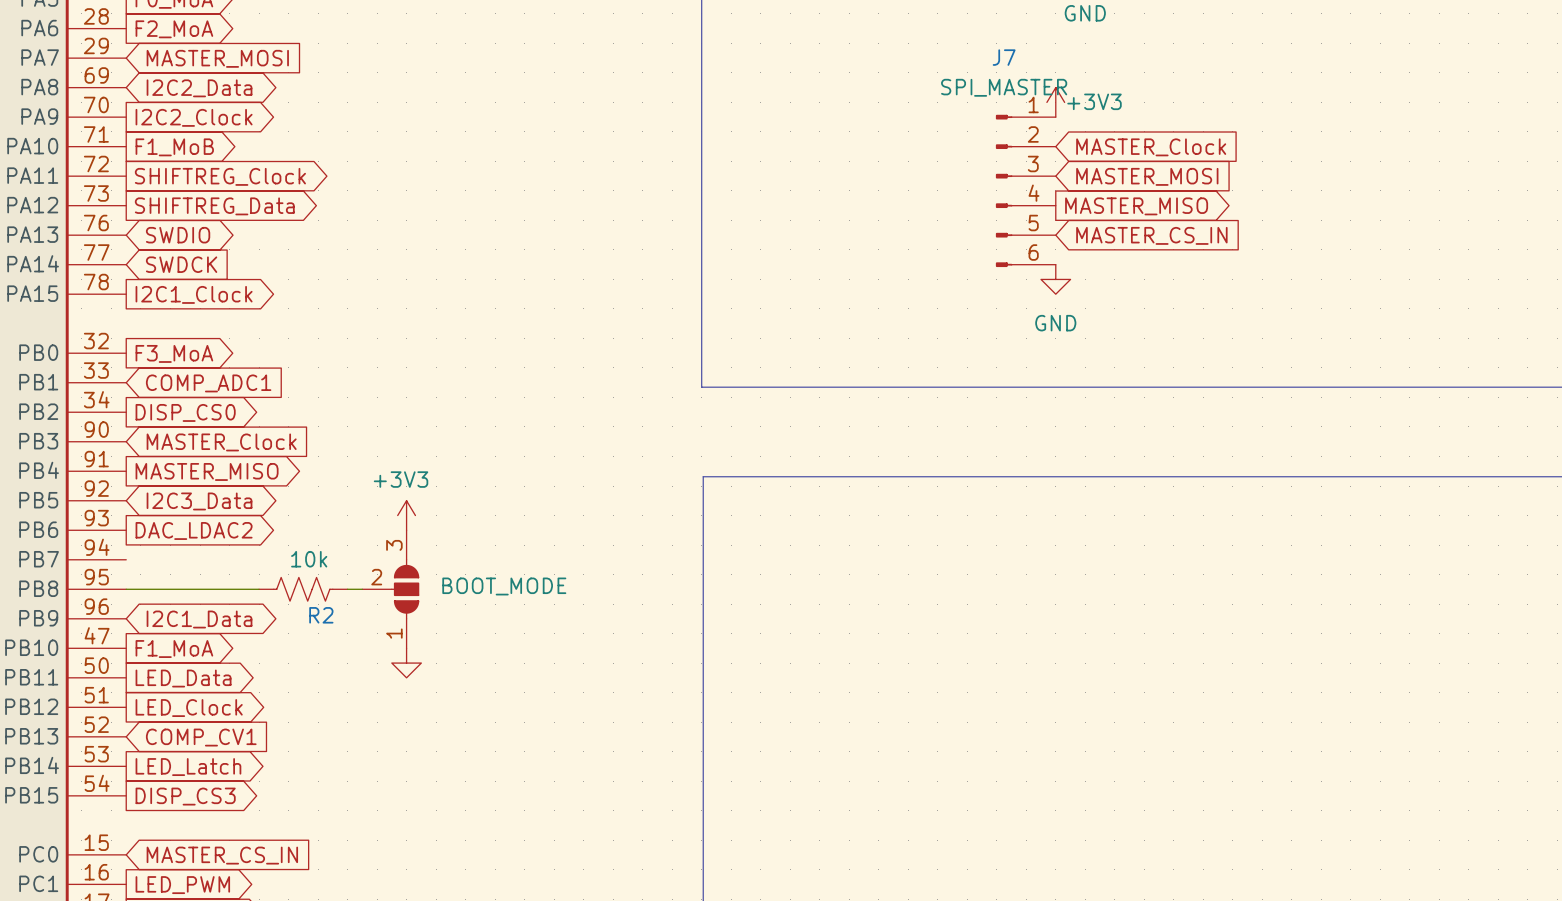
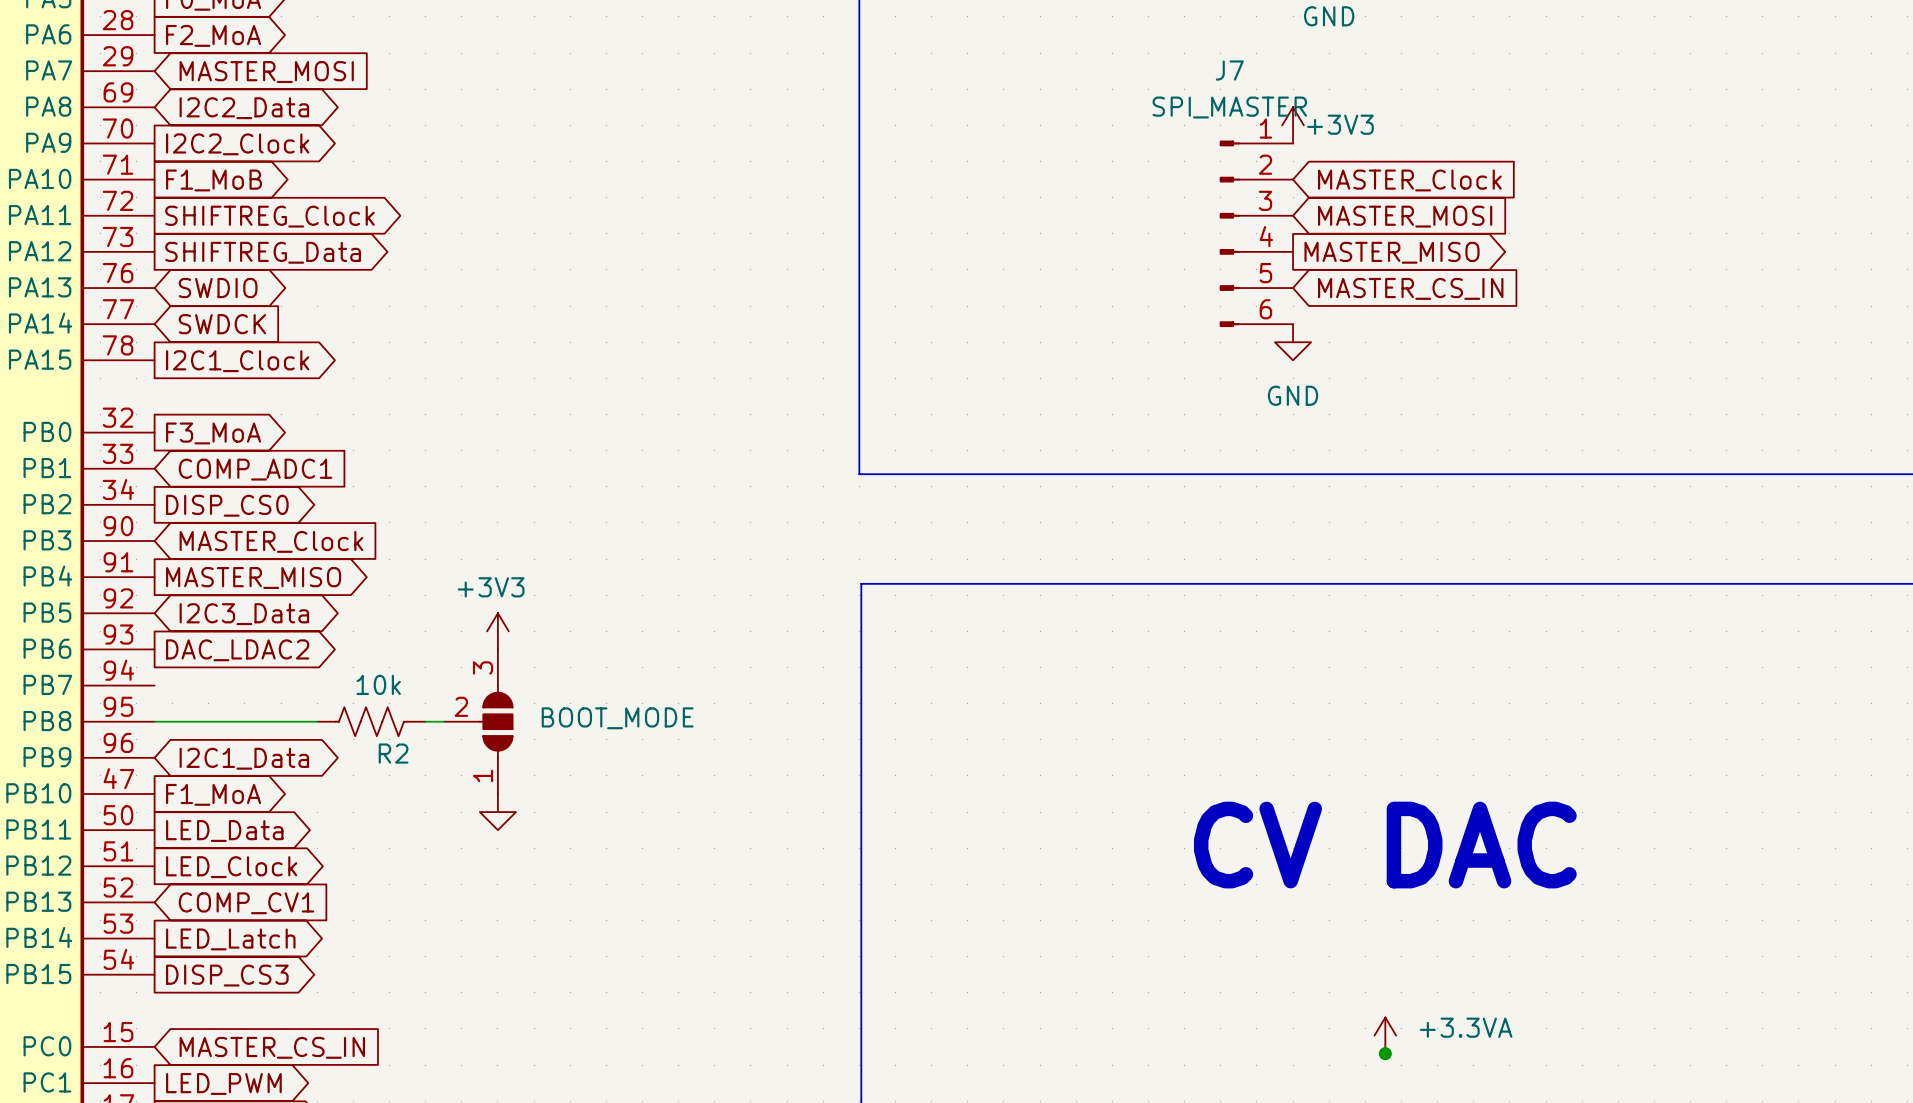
text: none -> CV DAC (1385, 845)
power symbol: none -> +3.3VA (1385, 1035)
junction: none -> (1385, 1053)

